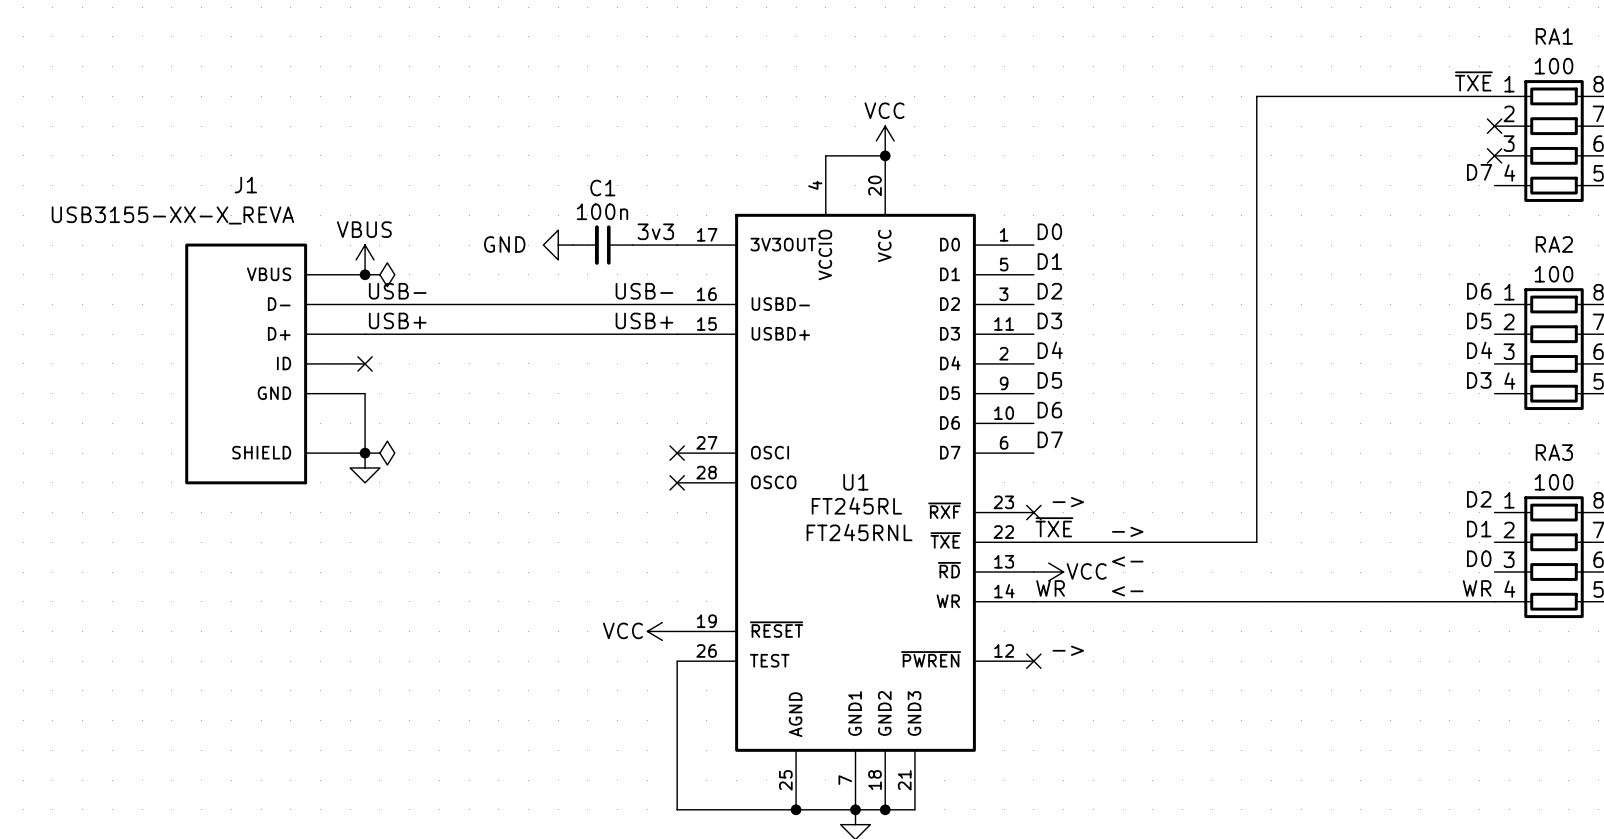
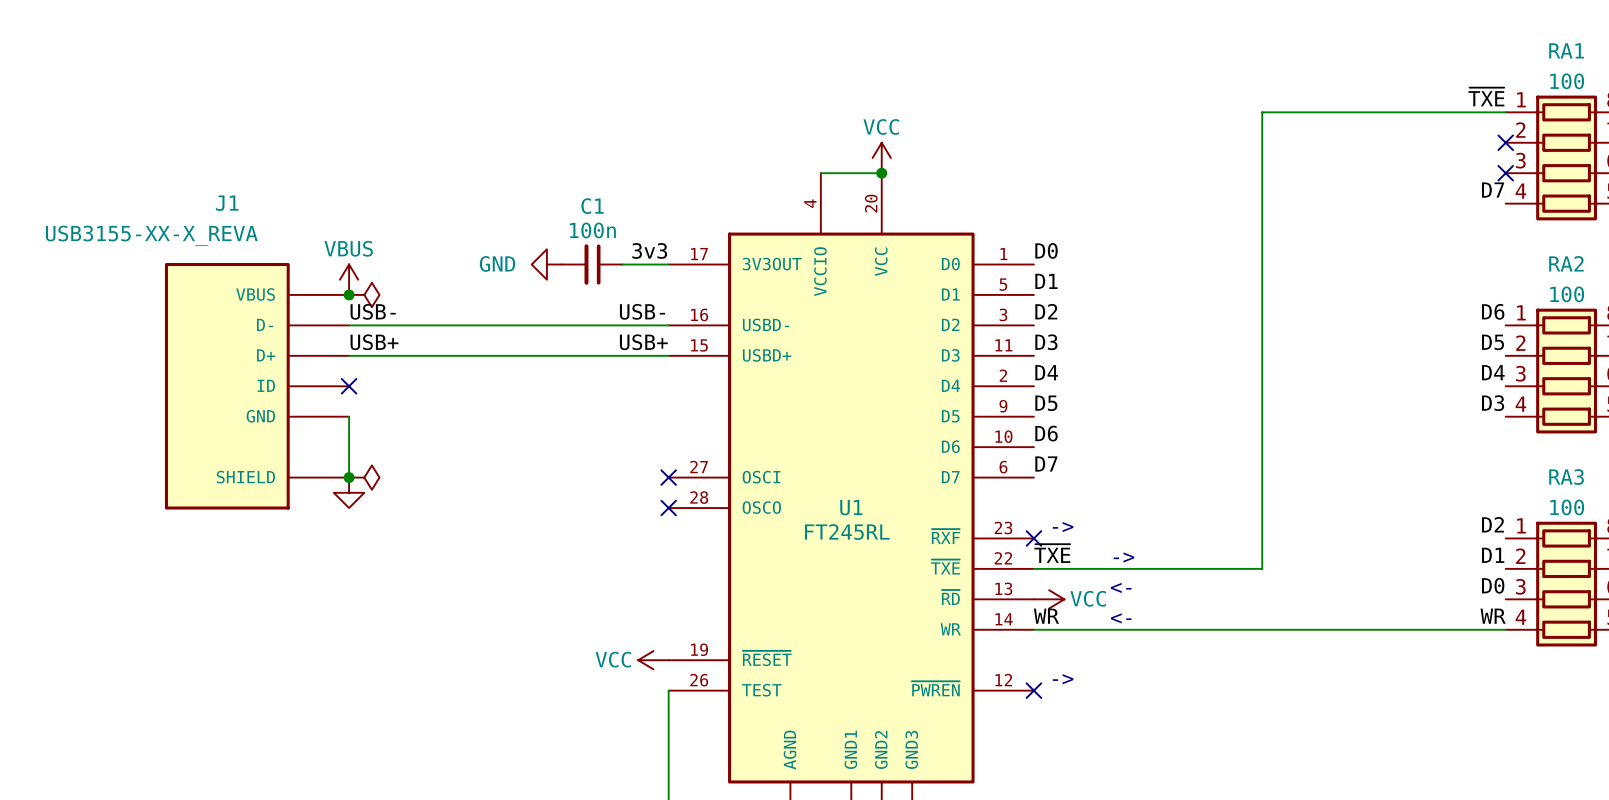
text: FT245RNL (859, 532) -> none

